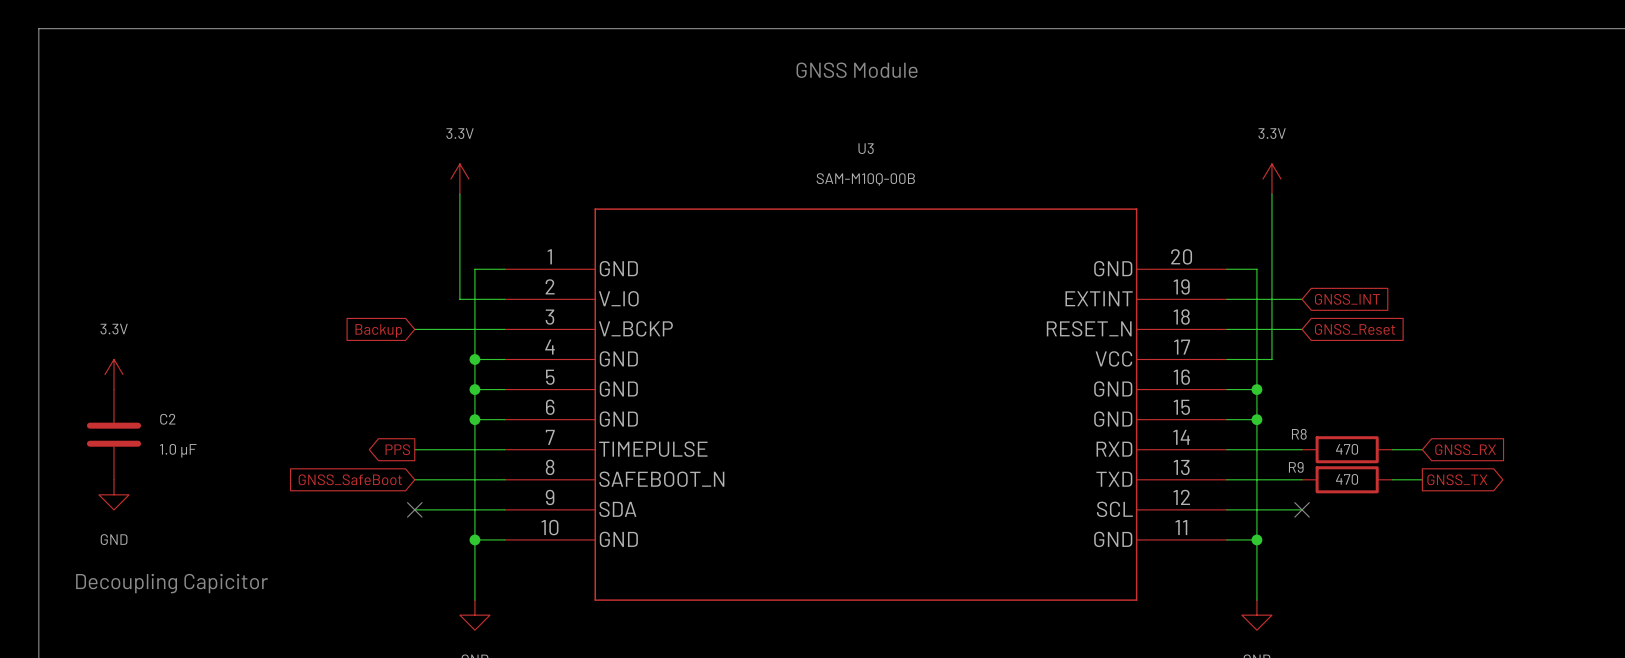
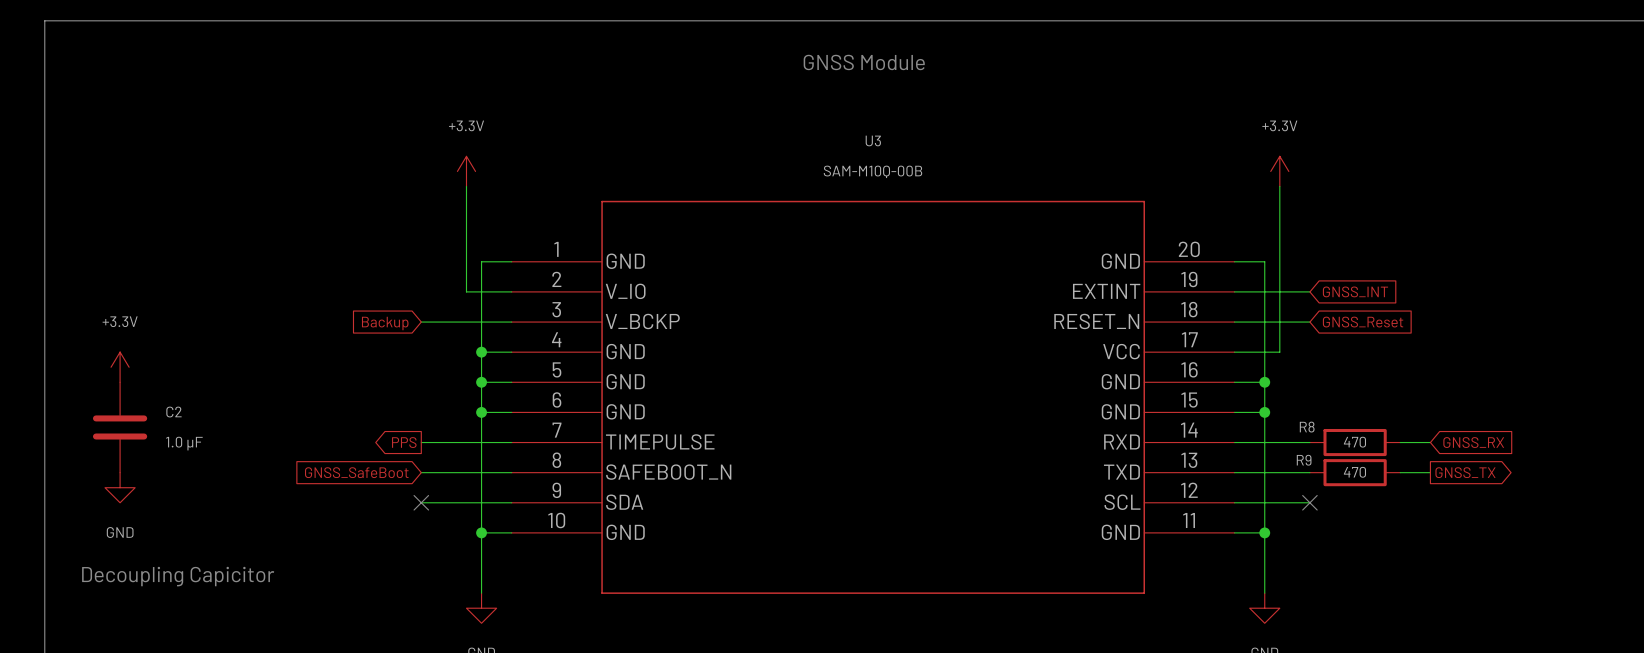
power symbol: 3.3V (459, 179) -> +3.3V (466, 171)
power symbol: 3.3V (1271, 179) -> +3.3V (1279, 171)
power symbol: 3.3V (114, 374) -> +3.3V (120, 367)

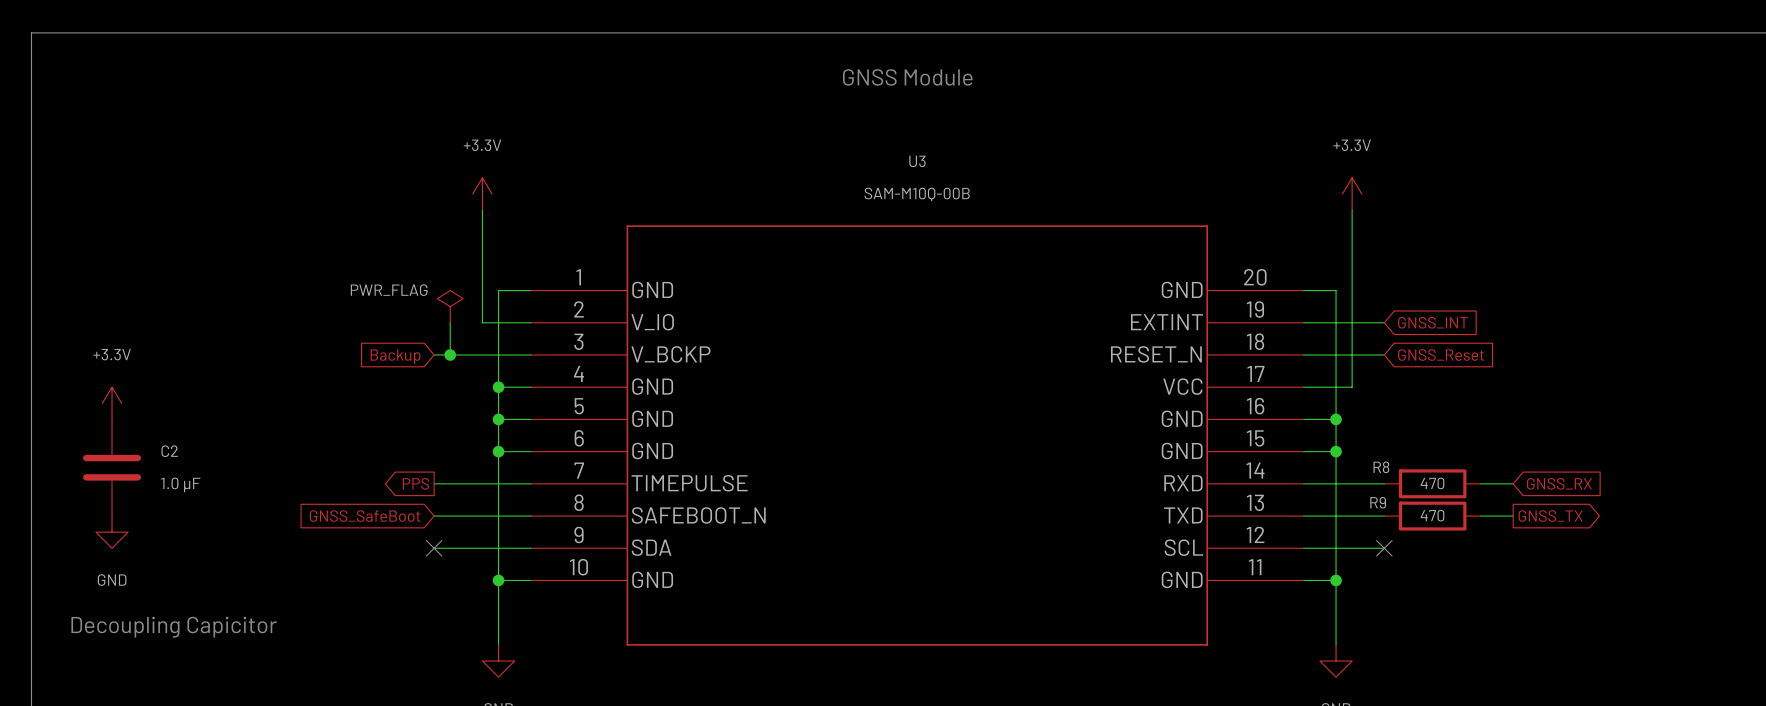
power symbol: none -> PWR_FLAG (450, 306)
wire: none -> (450, 322) (450, 355)
junction: none -> (450, 355)

